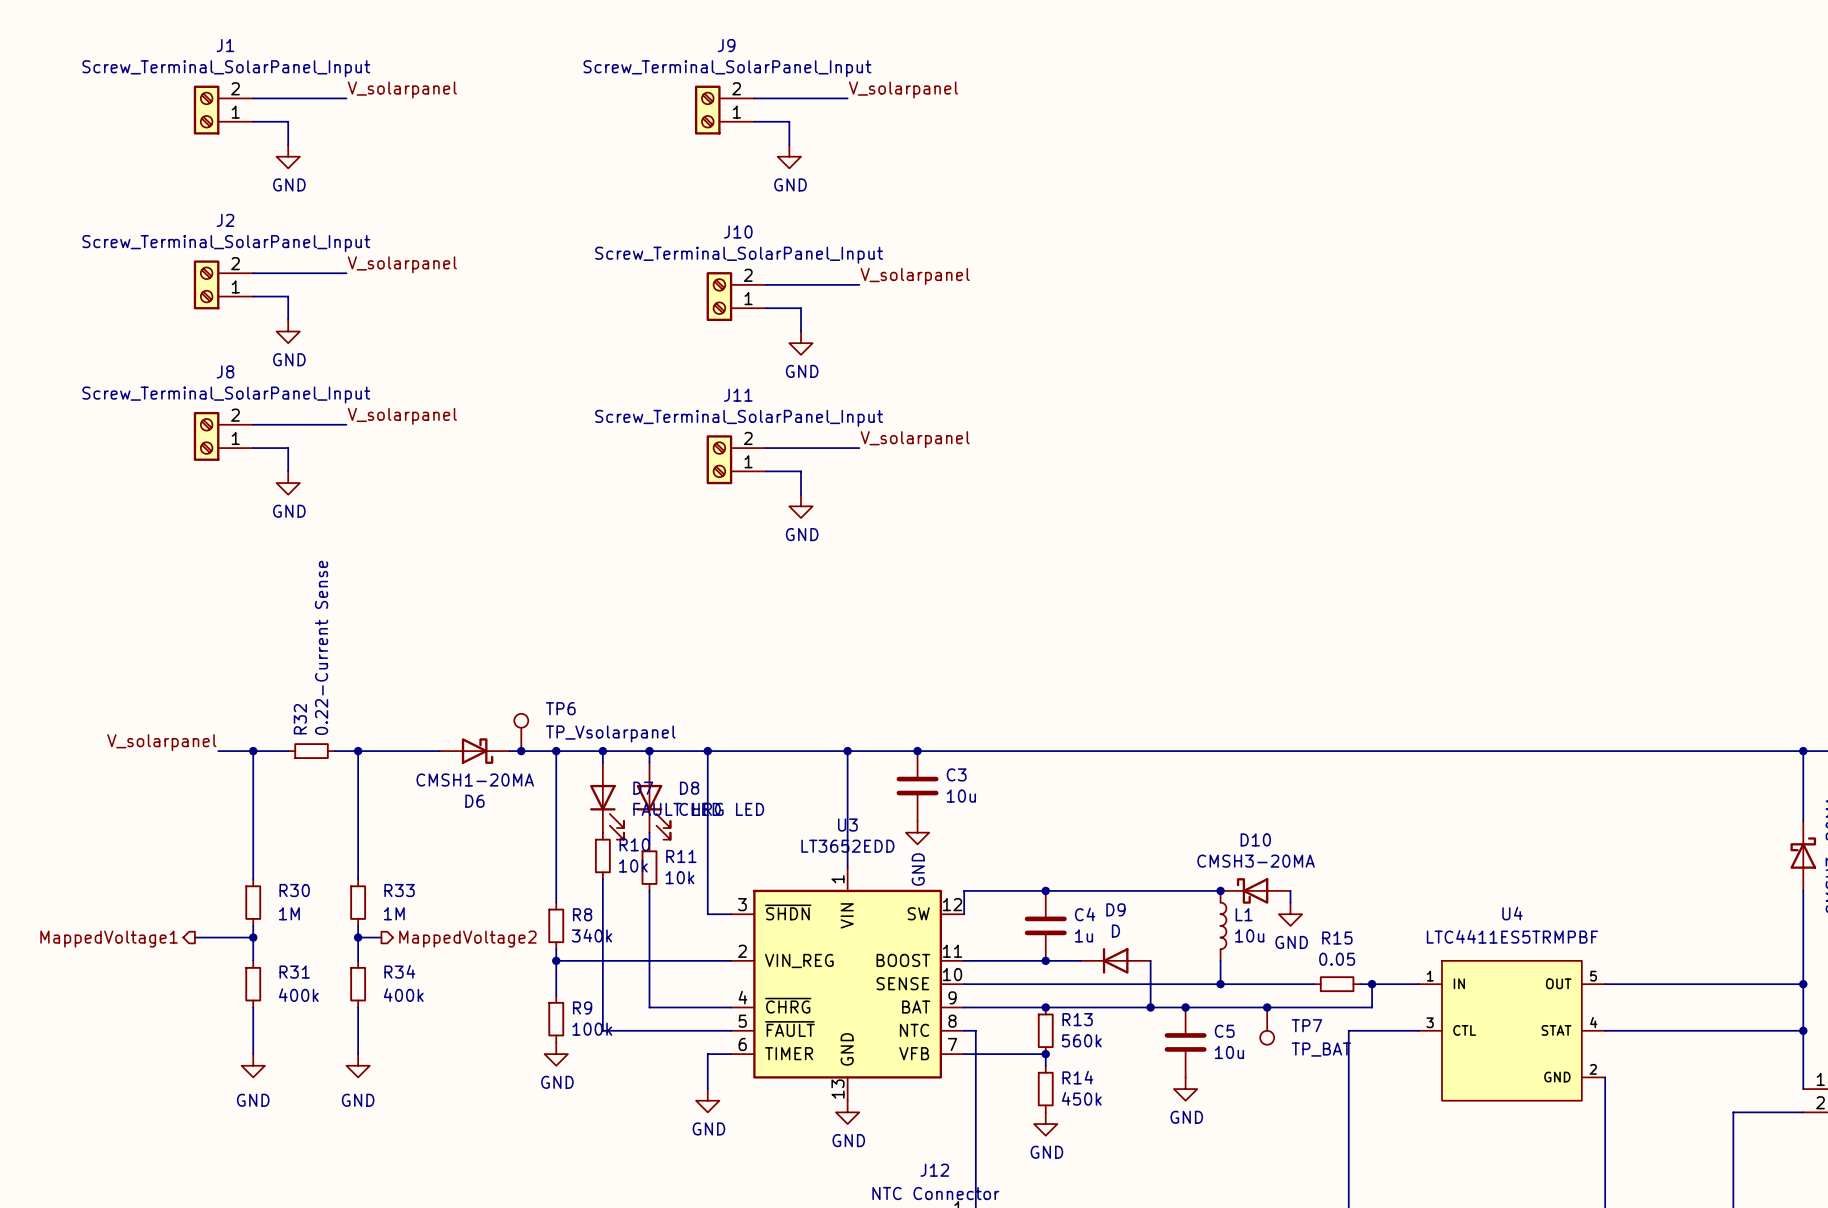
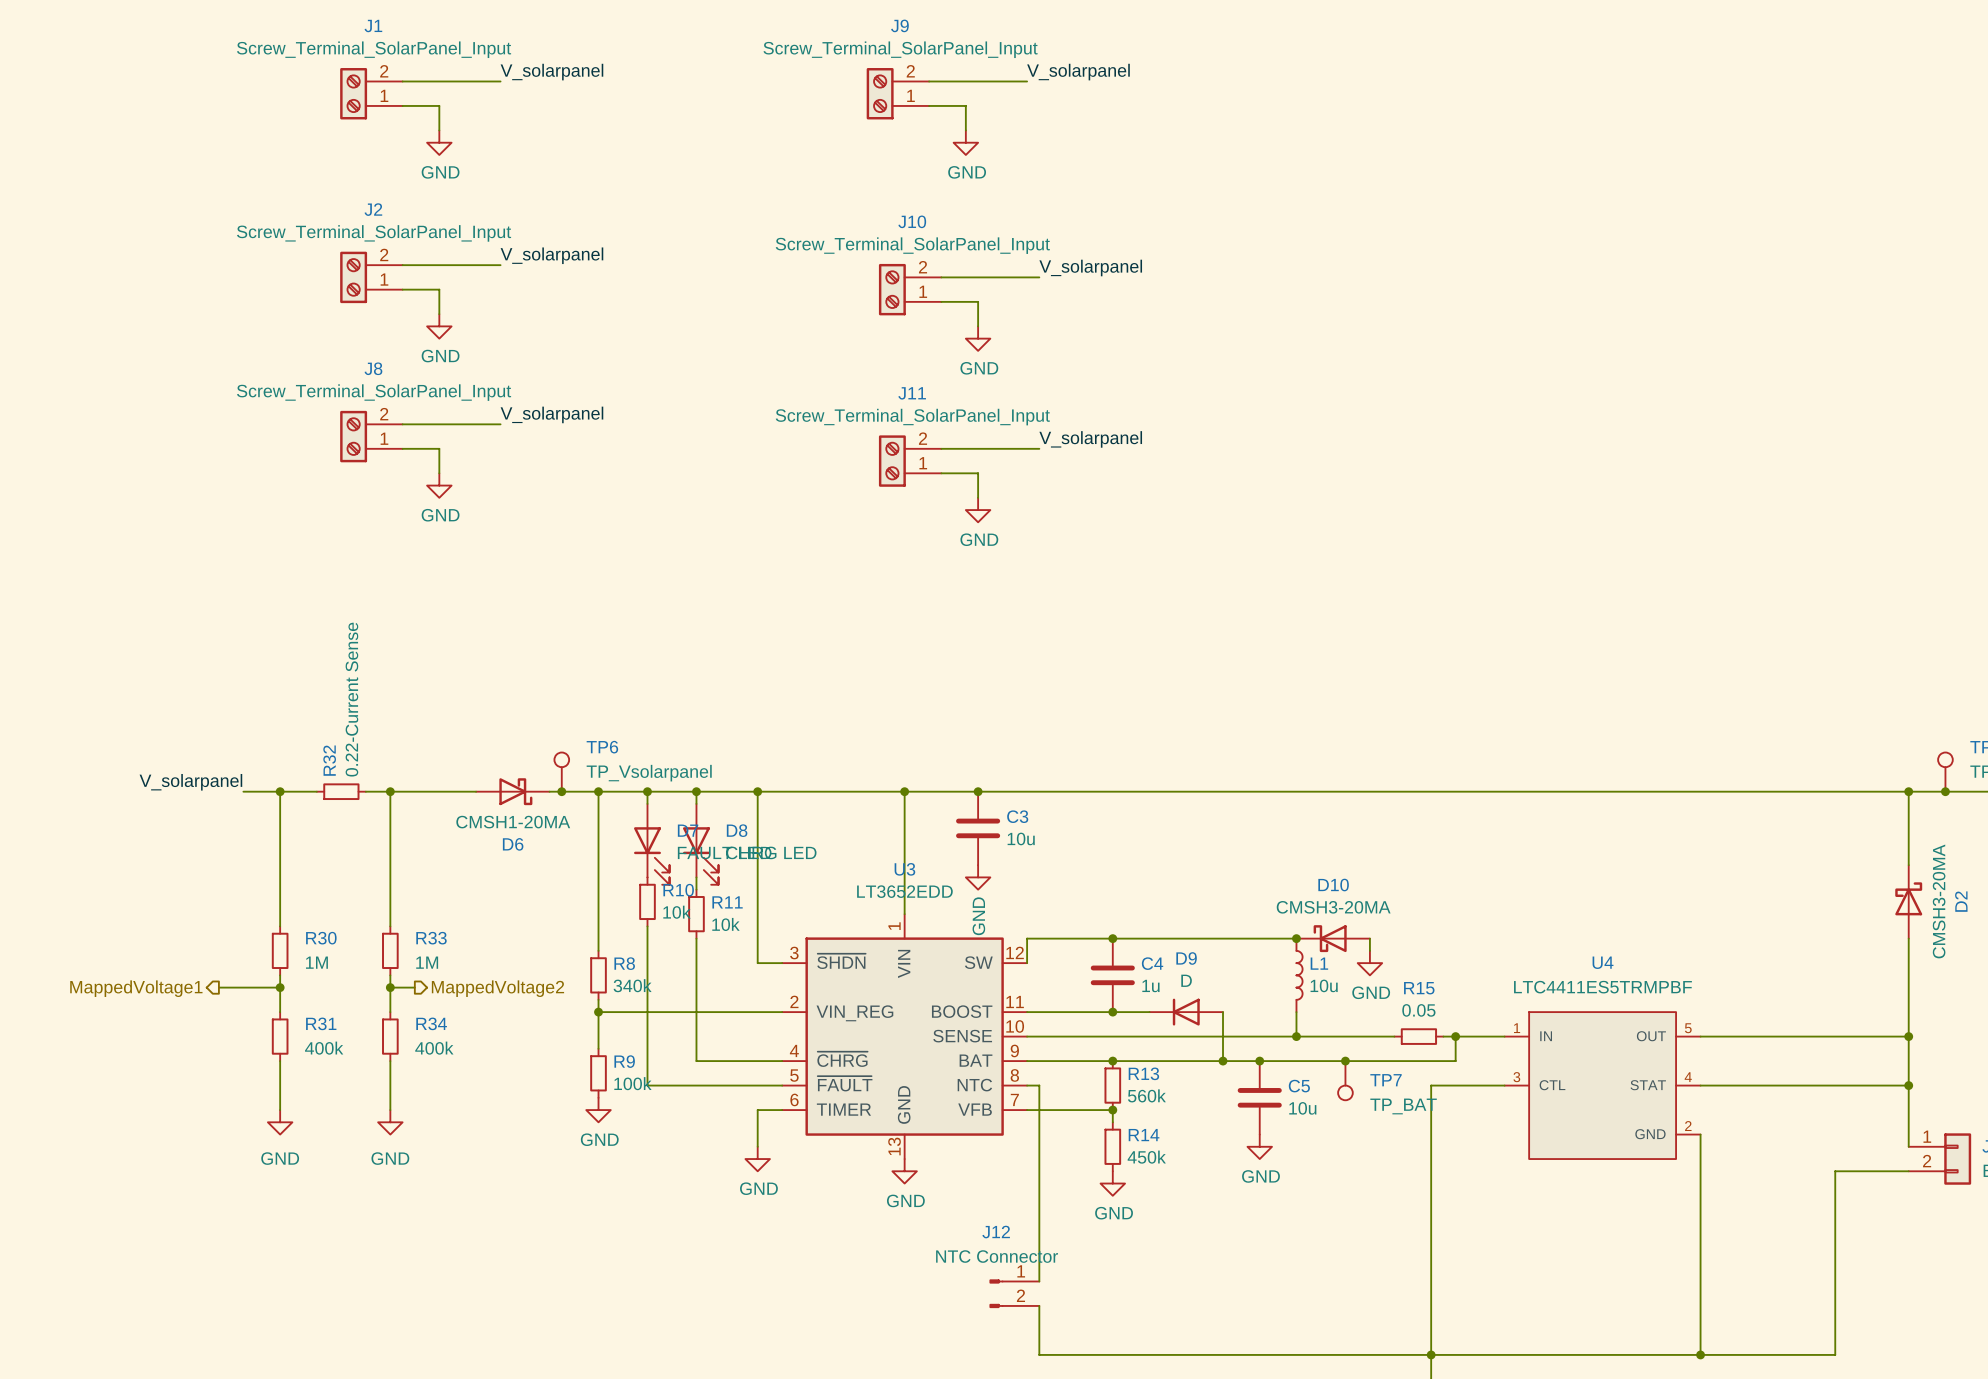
label position: V_solarpanel (402, 89) -> V_solarpanel (551, 72)
label position: V_solarpanel (903, 89) -> V_solarpanel (1078, 72)
wire: (253, 98) (346, 98) -> (402, 81) (500, 81)
wire: (754, 98) (847, 98) -> (929, 81) (1027, 81)
J1 position: (223, 110) -> (371, 93)
J9 position: (724, 110) -> (897, 93)
wire: (253, 121) (288, 121) (288, 145) -> (402, 105) (439, 105) (439, 130)
wire: (754, 121) (789, 121) (789, 145) -> (929, 105) (965, 105) (965, 130)
power symbol: none -> GND (439, 142)
power symbol: none -> GND (965, 142)
power symbol: GND (288, 156) -> none
power symbol: GND (789, 156) -> none
label position: V_solarpanel (402, 264) -> V_solarpanel (551, 255)
wire: (253, 273) (346, 273) -> (402, 265) (500, 265)
label position: V_solarpanel (915, 276) -> V_solarpanel (1090, 267)
J2 position: (223, 284) -> (371, 277)
wire: (766, 284) (859, 284) -> (941, 277) (1039, 277)
wire: (253, 296) (288, 296) (288, 319) -> (402, 289) (439, 289) (439, 314)
J10 position: (736, 296) -> (910, 289)
power symbol: none -> GND (439, 326)
wire: (766, 308) (801, 308) (801, 331) -> (941, 301) (978, 301) (978, 326)
power symbol: none -> GND (978, 338)
power symbol: GND (288, 331) -> none
power symbol: GND (801, 343) -> none
label position: V_solarpanel (402, 416) -> V_solarpanel (551, 414)
wire: (253, 424) (346, 424) -> (402, 424) (500, 424)
J8 position: (223, 436) -> (371, 436)
label position: V_solarpanel (915, 439) -> V_solarpanel (1090, 439)
wire: (253, 448) (288, 448) (288, 471) -> (402, 448) (439, 448) (439, 473)
wire: (766, 448) (859, 448) -> (941, 448) (1039, 448)
power symbol: none -> GND (439, 485)
J11 position: (736, 459) -> (910, 461)
wire: (766, 471) (801, 471) (801, 494) -> (941, 473) (978, 473) (978, 497)
power symbol: GND (288, 483) -> none
power symbol: none -> GND (978, 510)
power symbol: GND (801, 506) -> none

